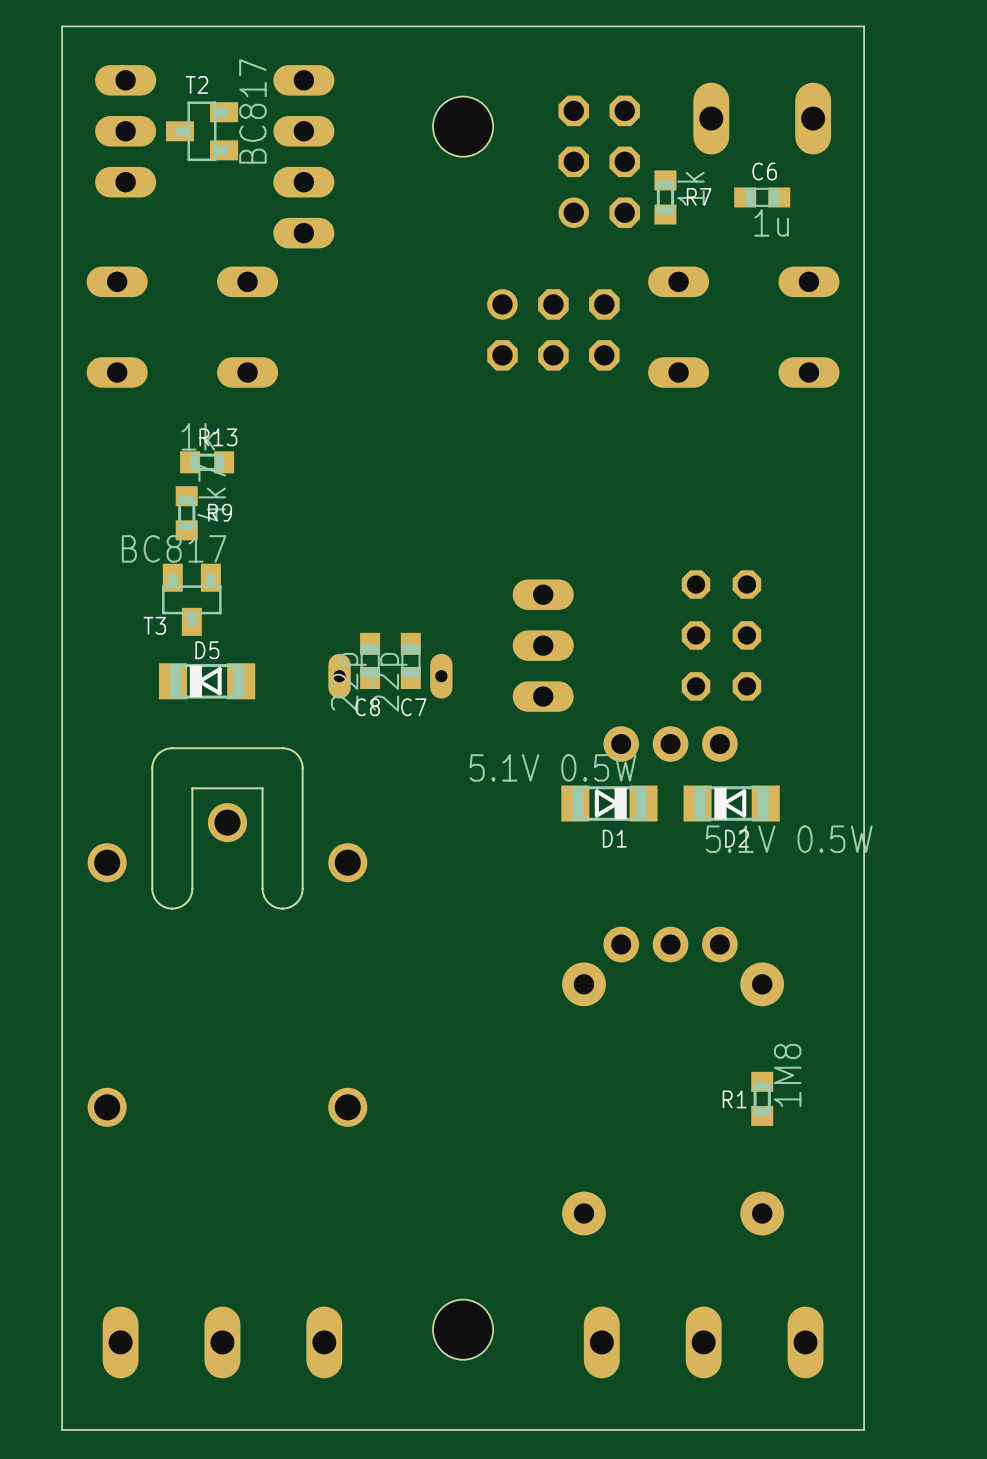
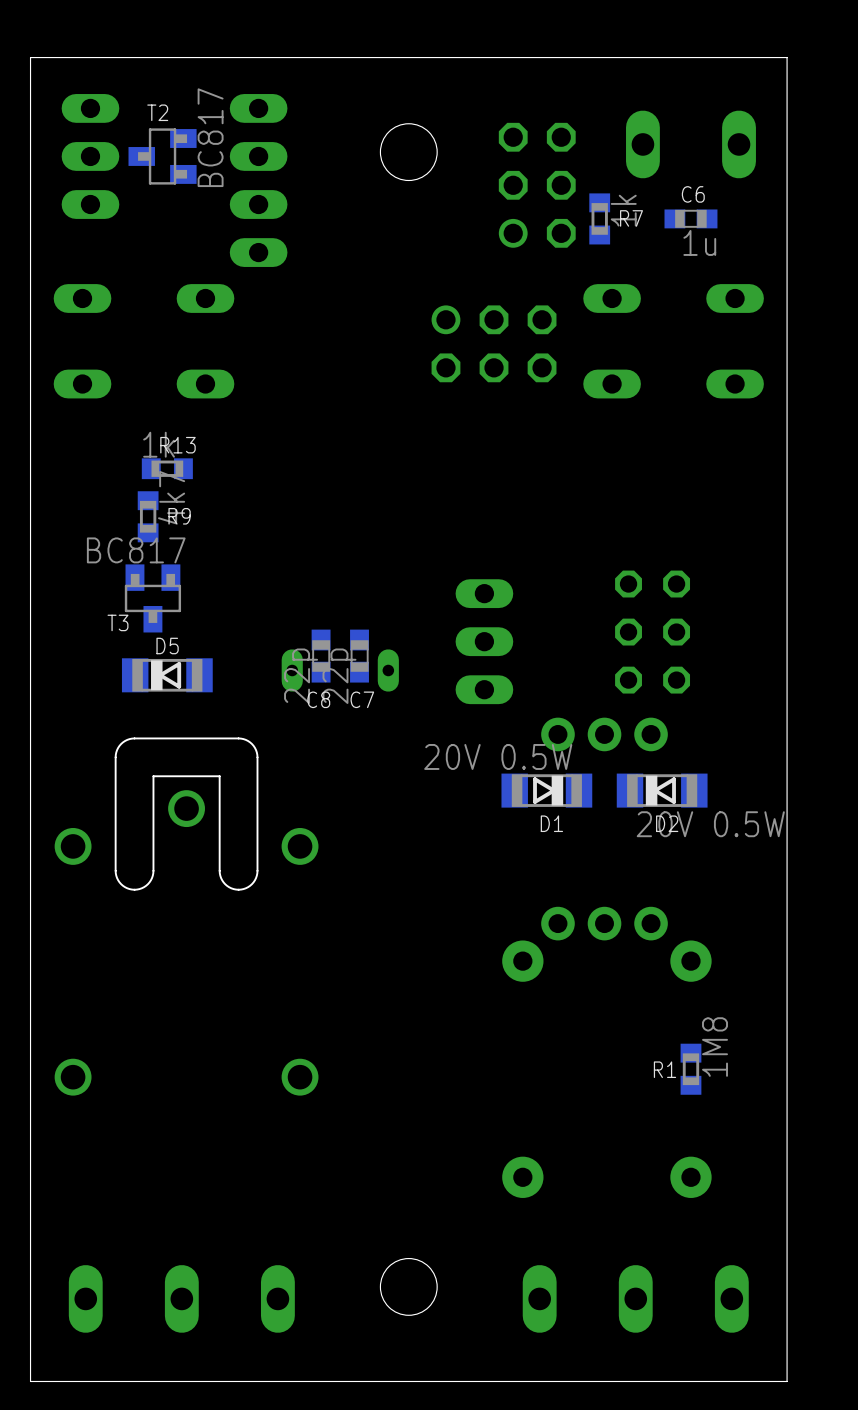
D1 value: 5.1V 0.5W (552, 767) -> 20V 0.5W (498, 756)
D2 value: 5.1V 0.5W (789, 839) -> 20V 0.5W (710, 824)

